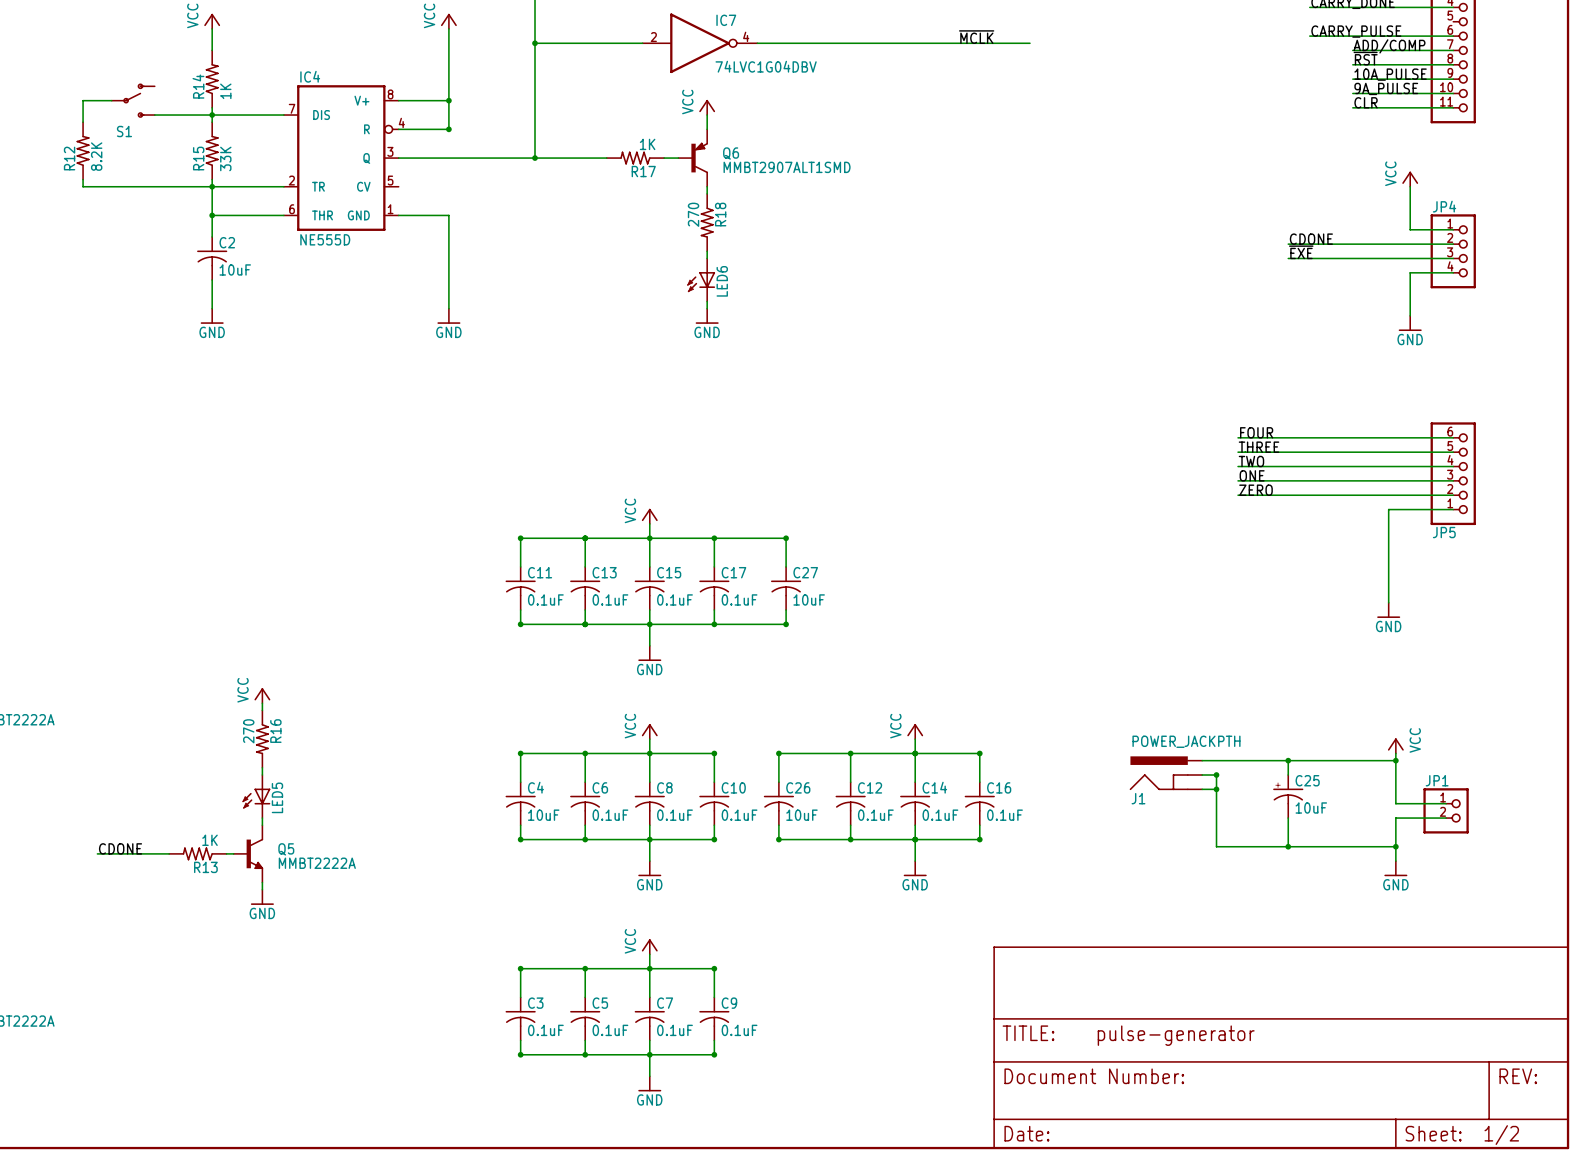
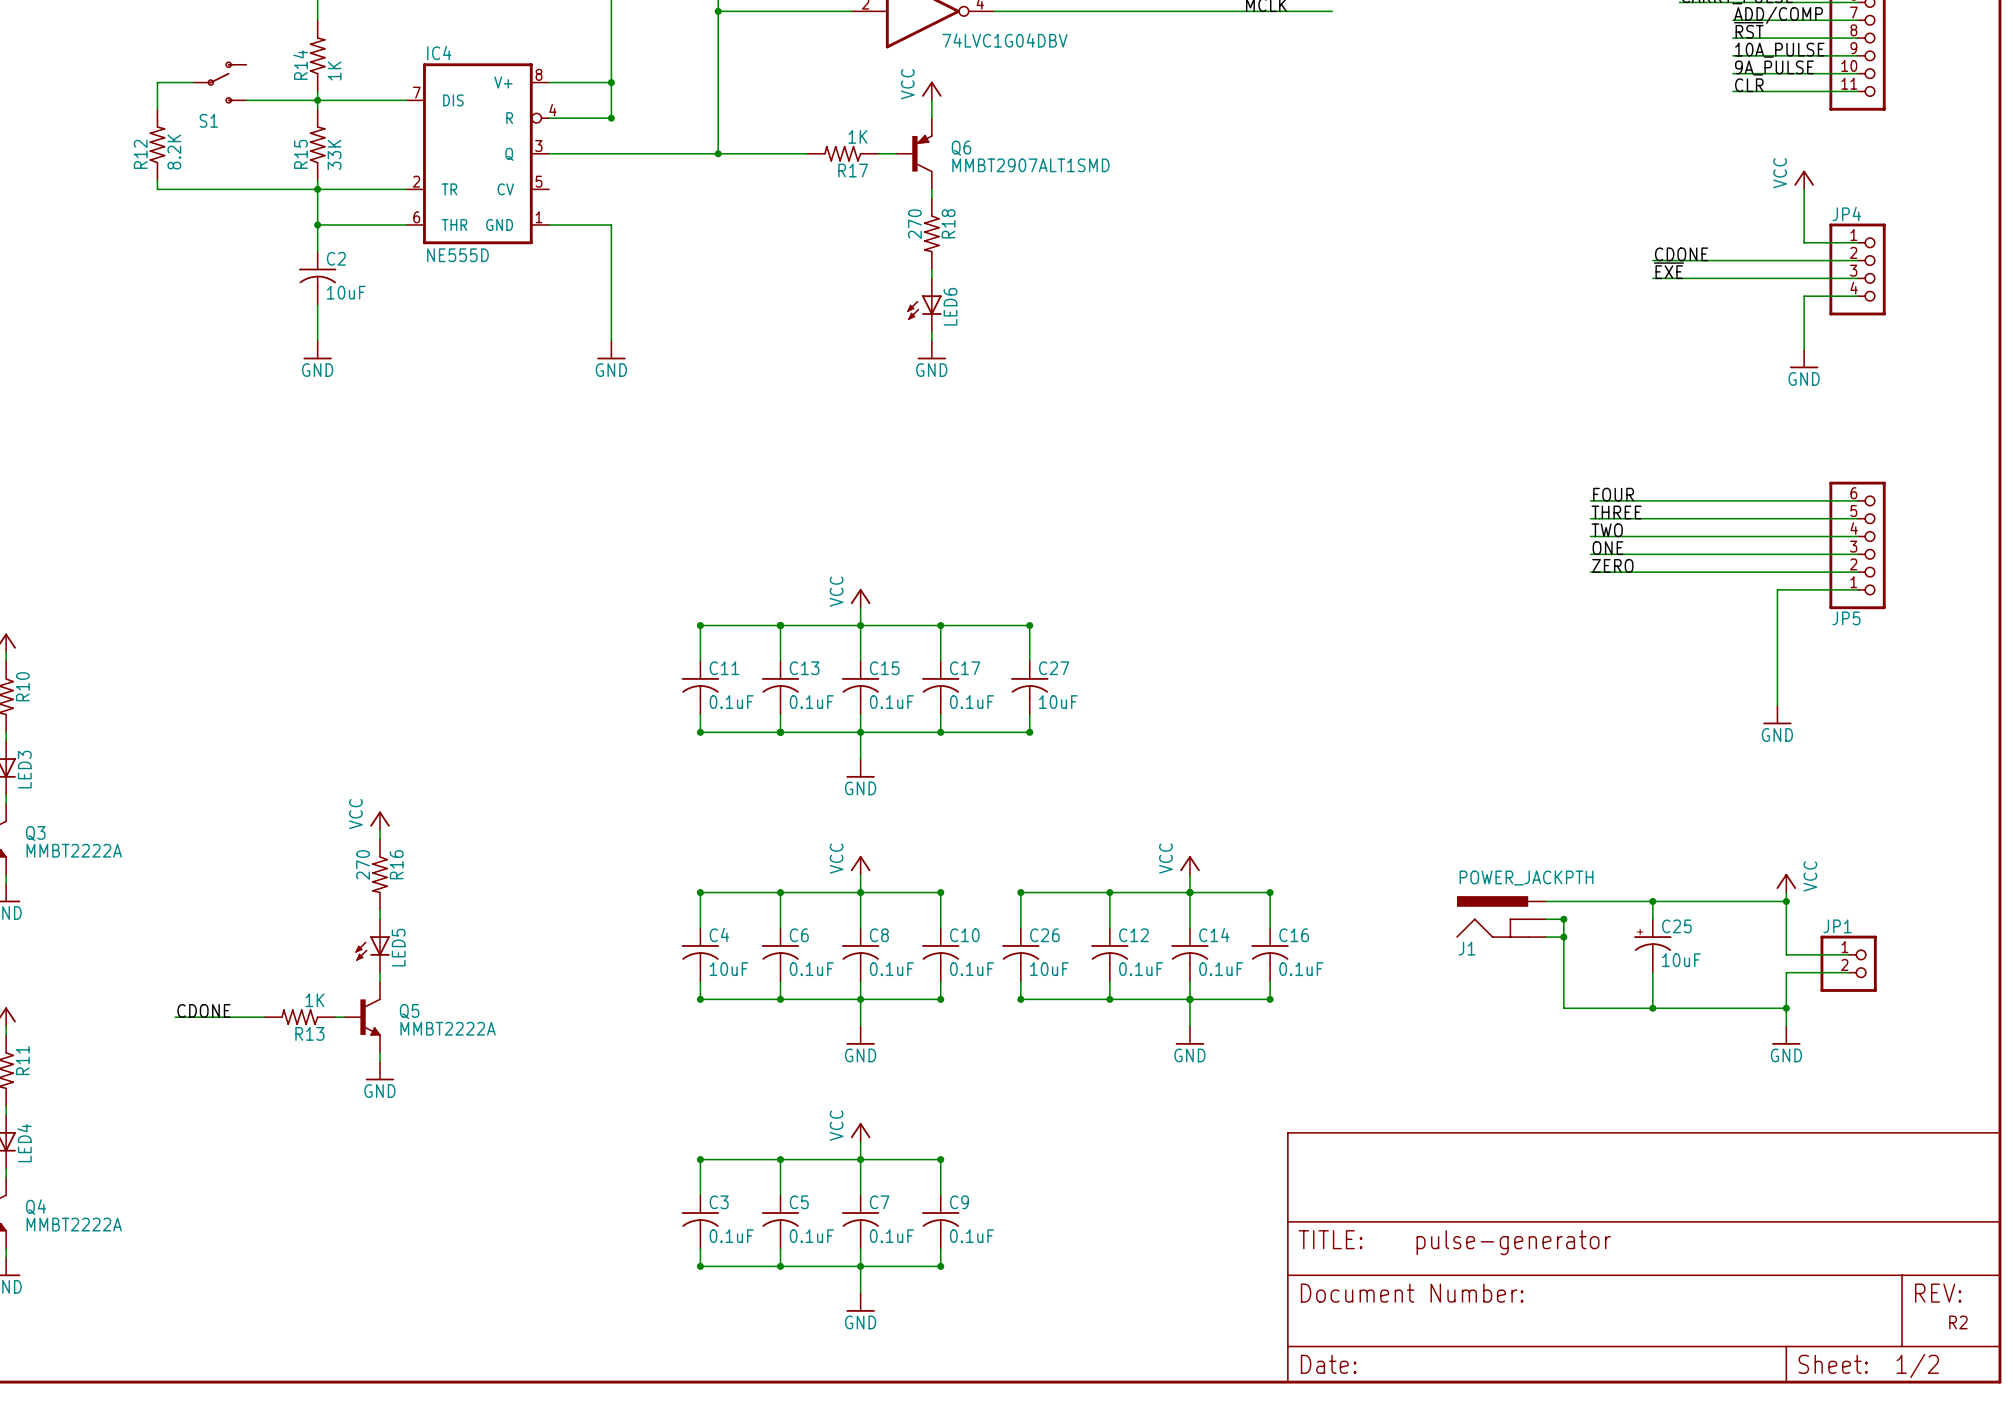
text: none -> R2 (1958, 1322)

